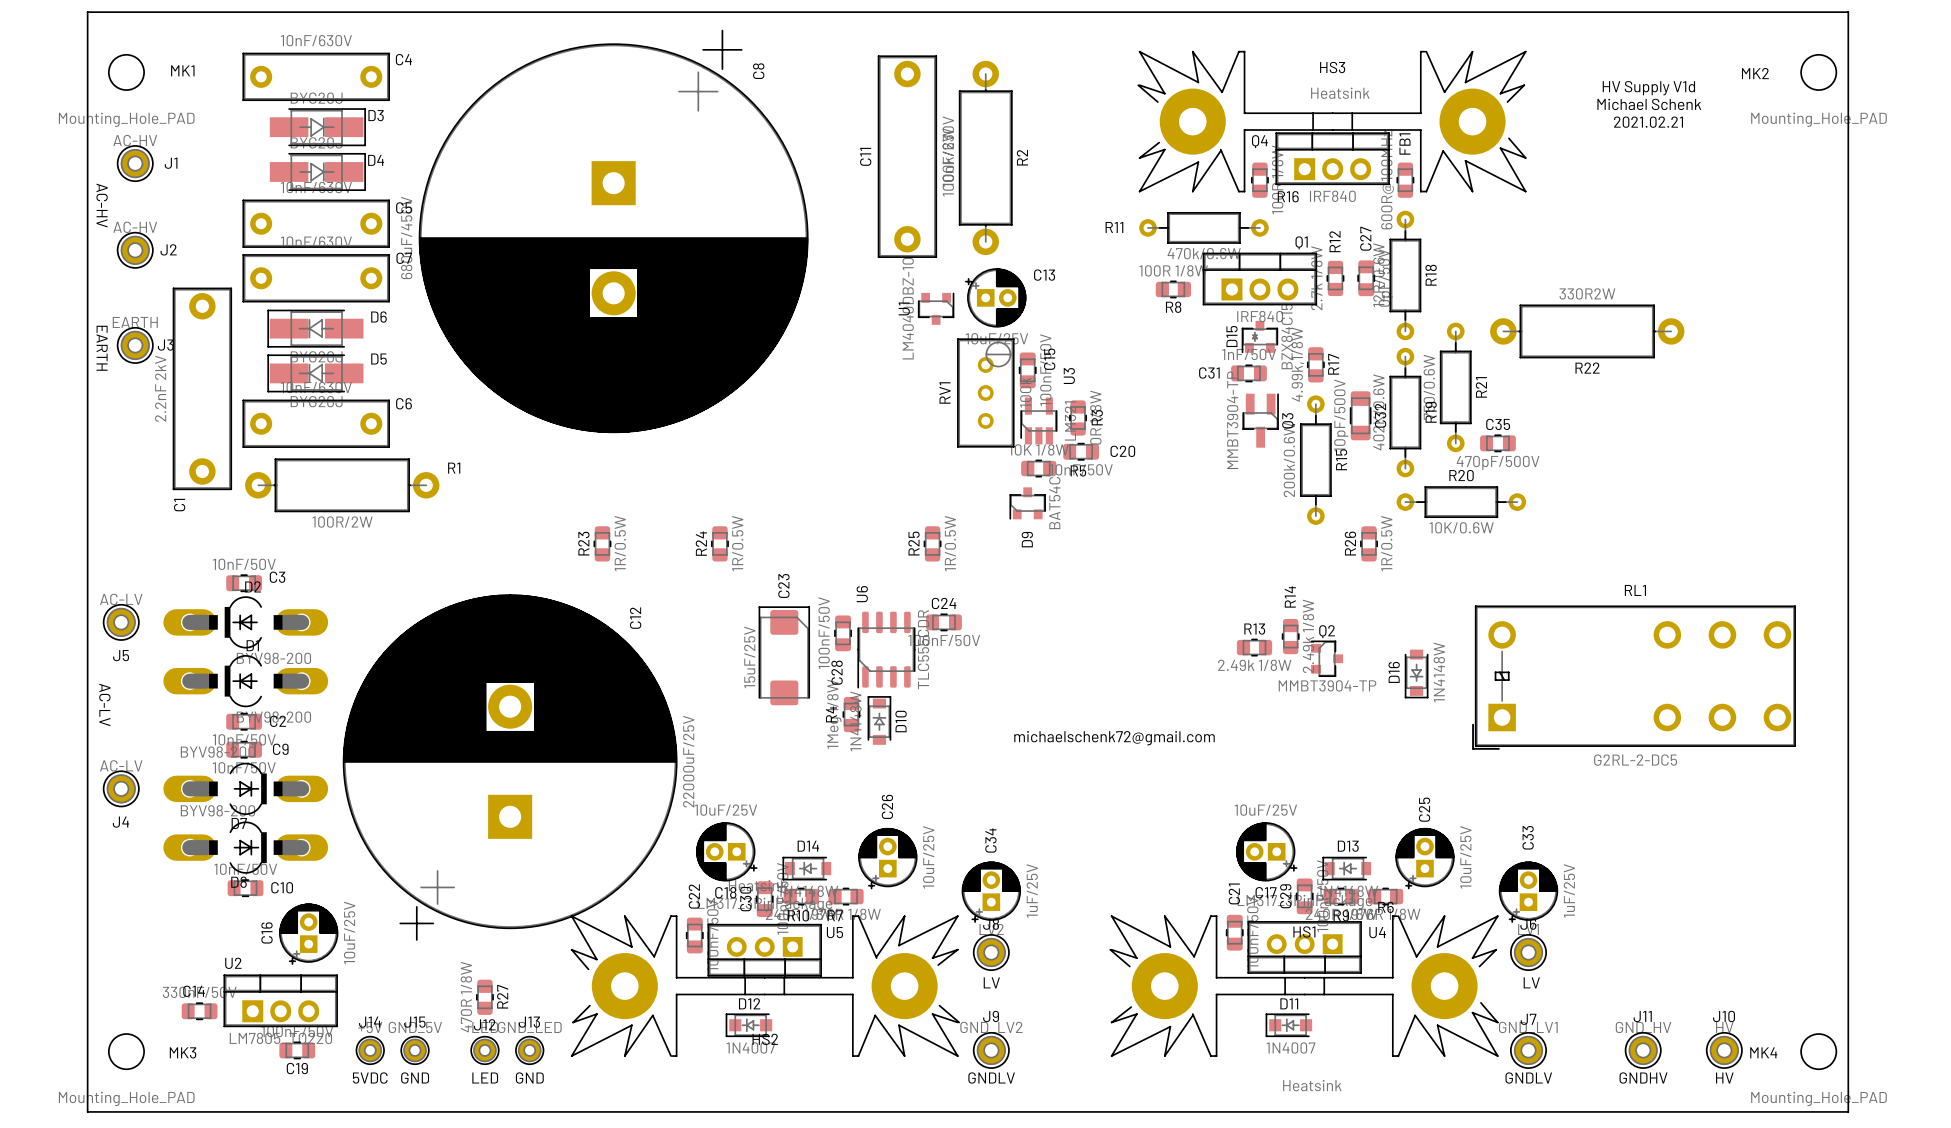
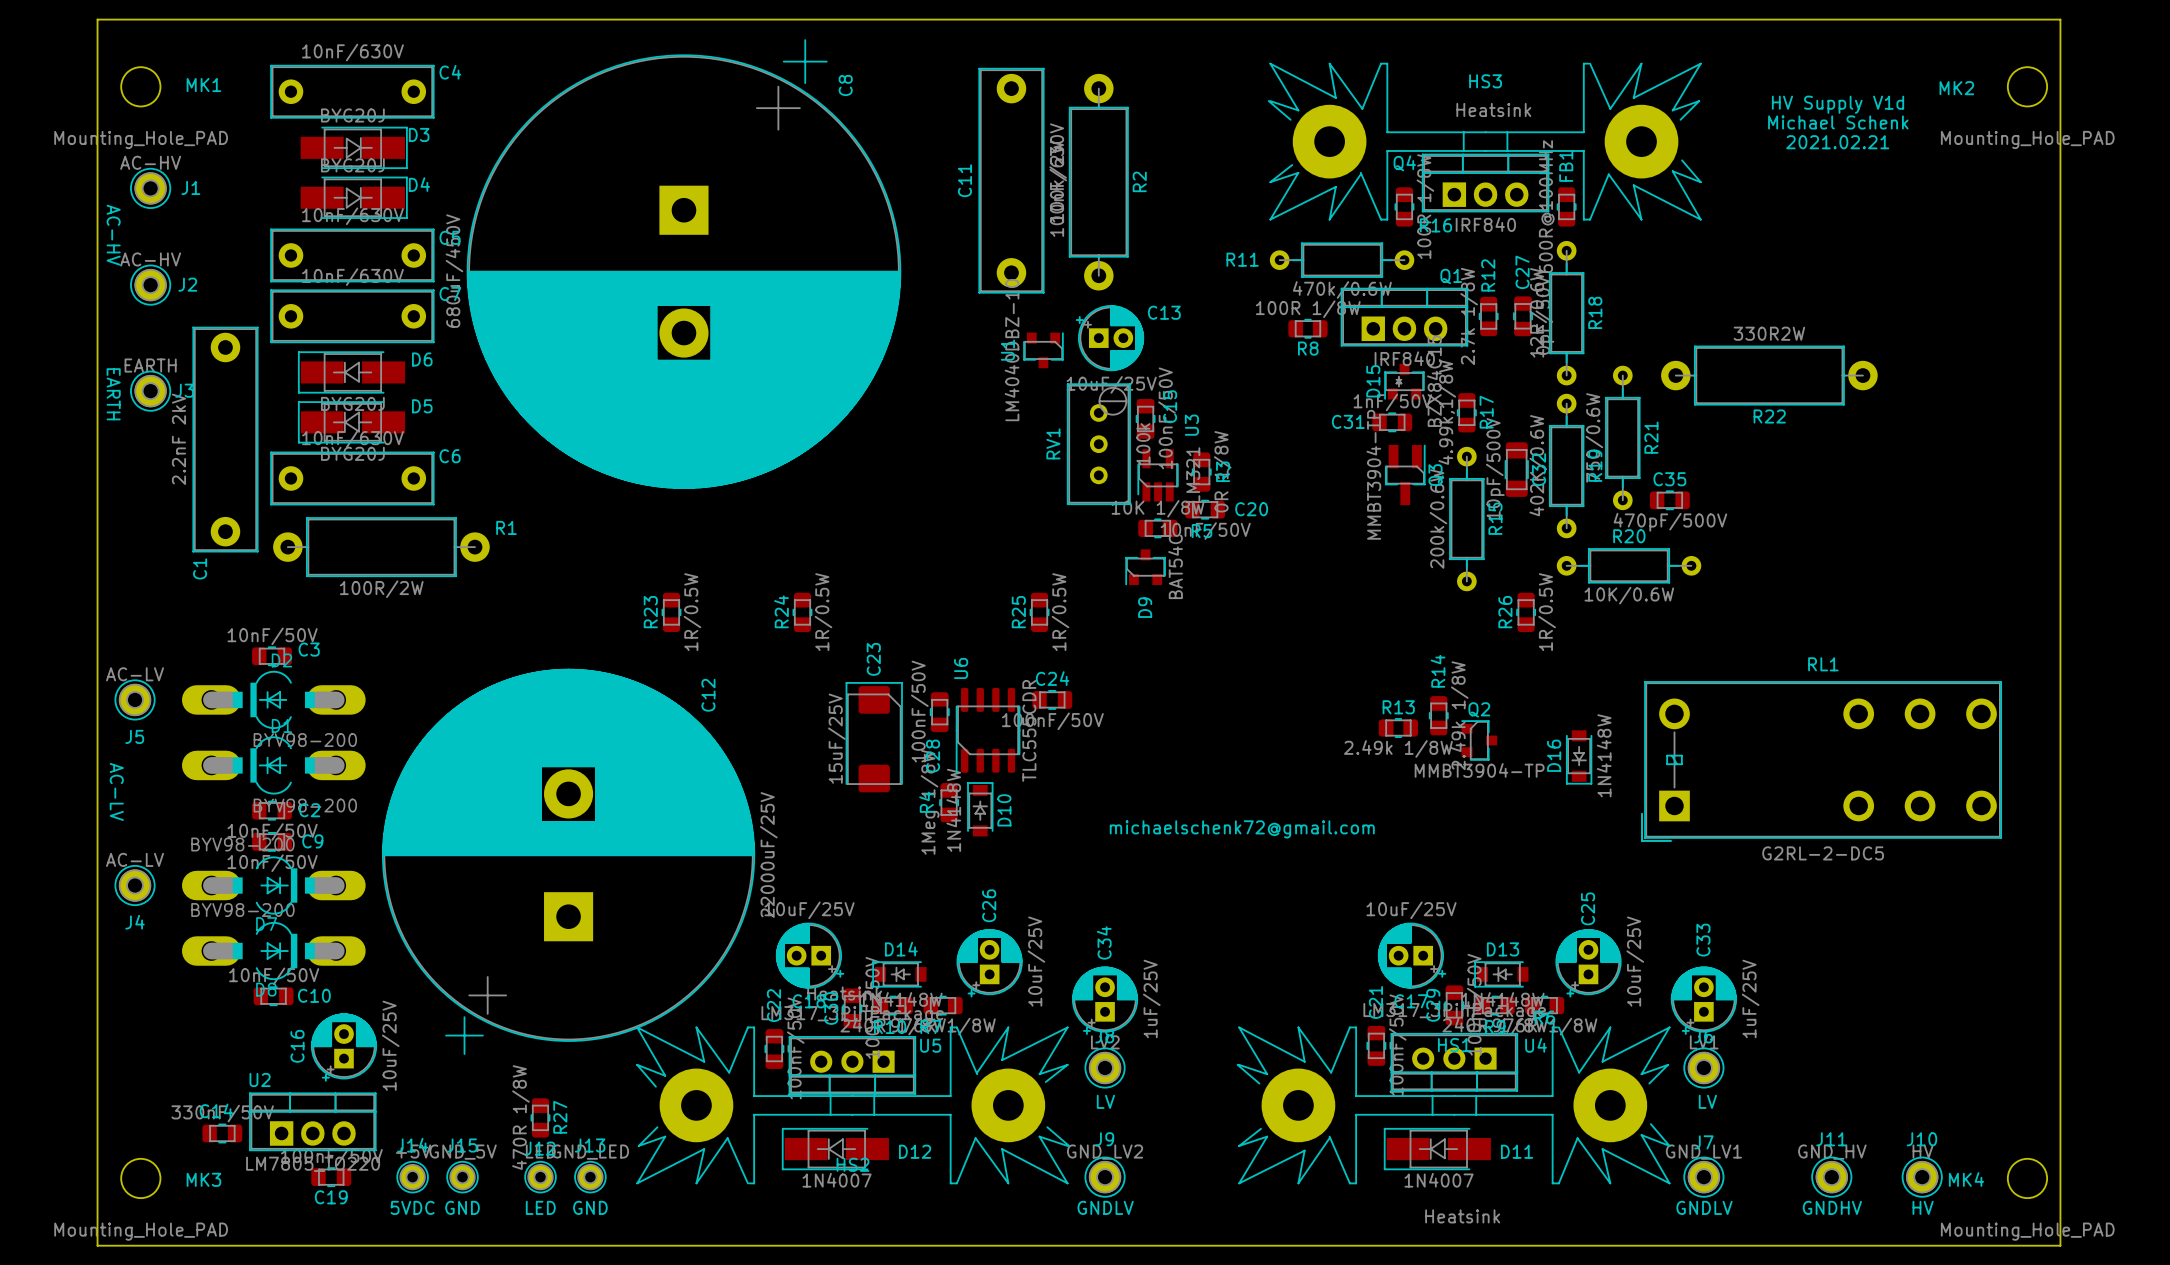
D12 name position: D12 (749, 1003) -> D12 (915, 1151)
D11 name position: D11 (1289, 1003) -> D11 (1517, 1151)
D12 footprint: [725, 1013, 773, 1037] -> [782, 1128, 889, 1171]
D11 footprint: [1265, 1013, 1313, 1037] -> [1383, 1128, 1491, 1171]

